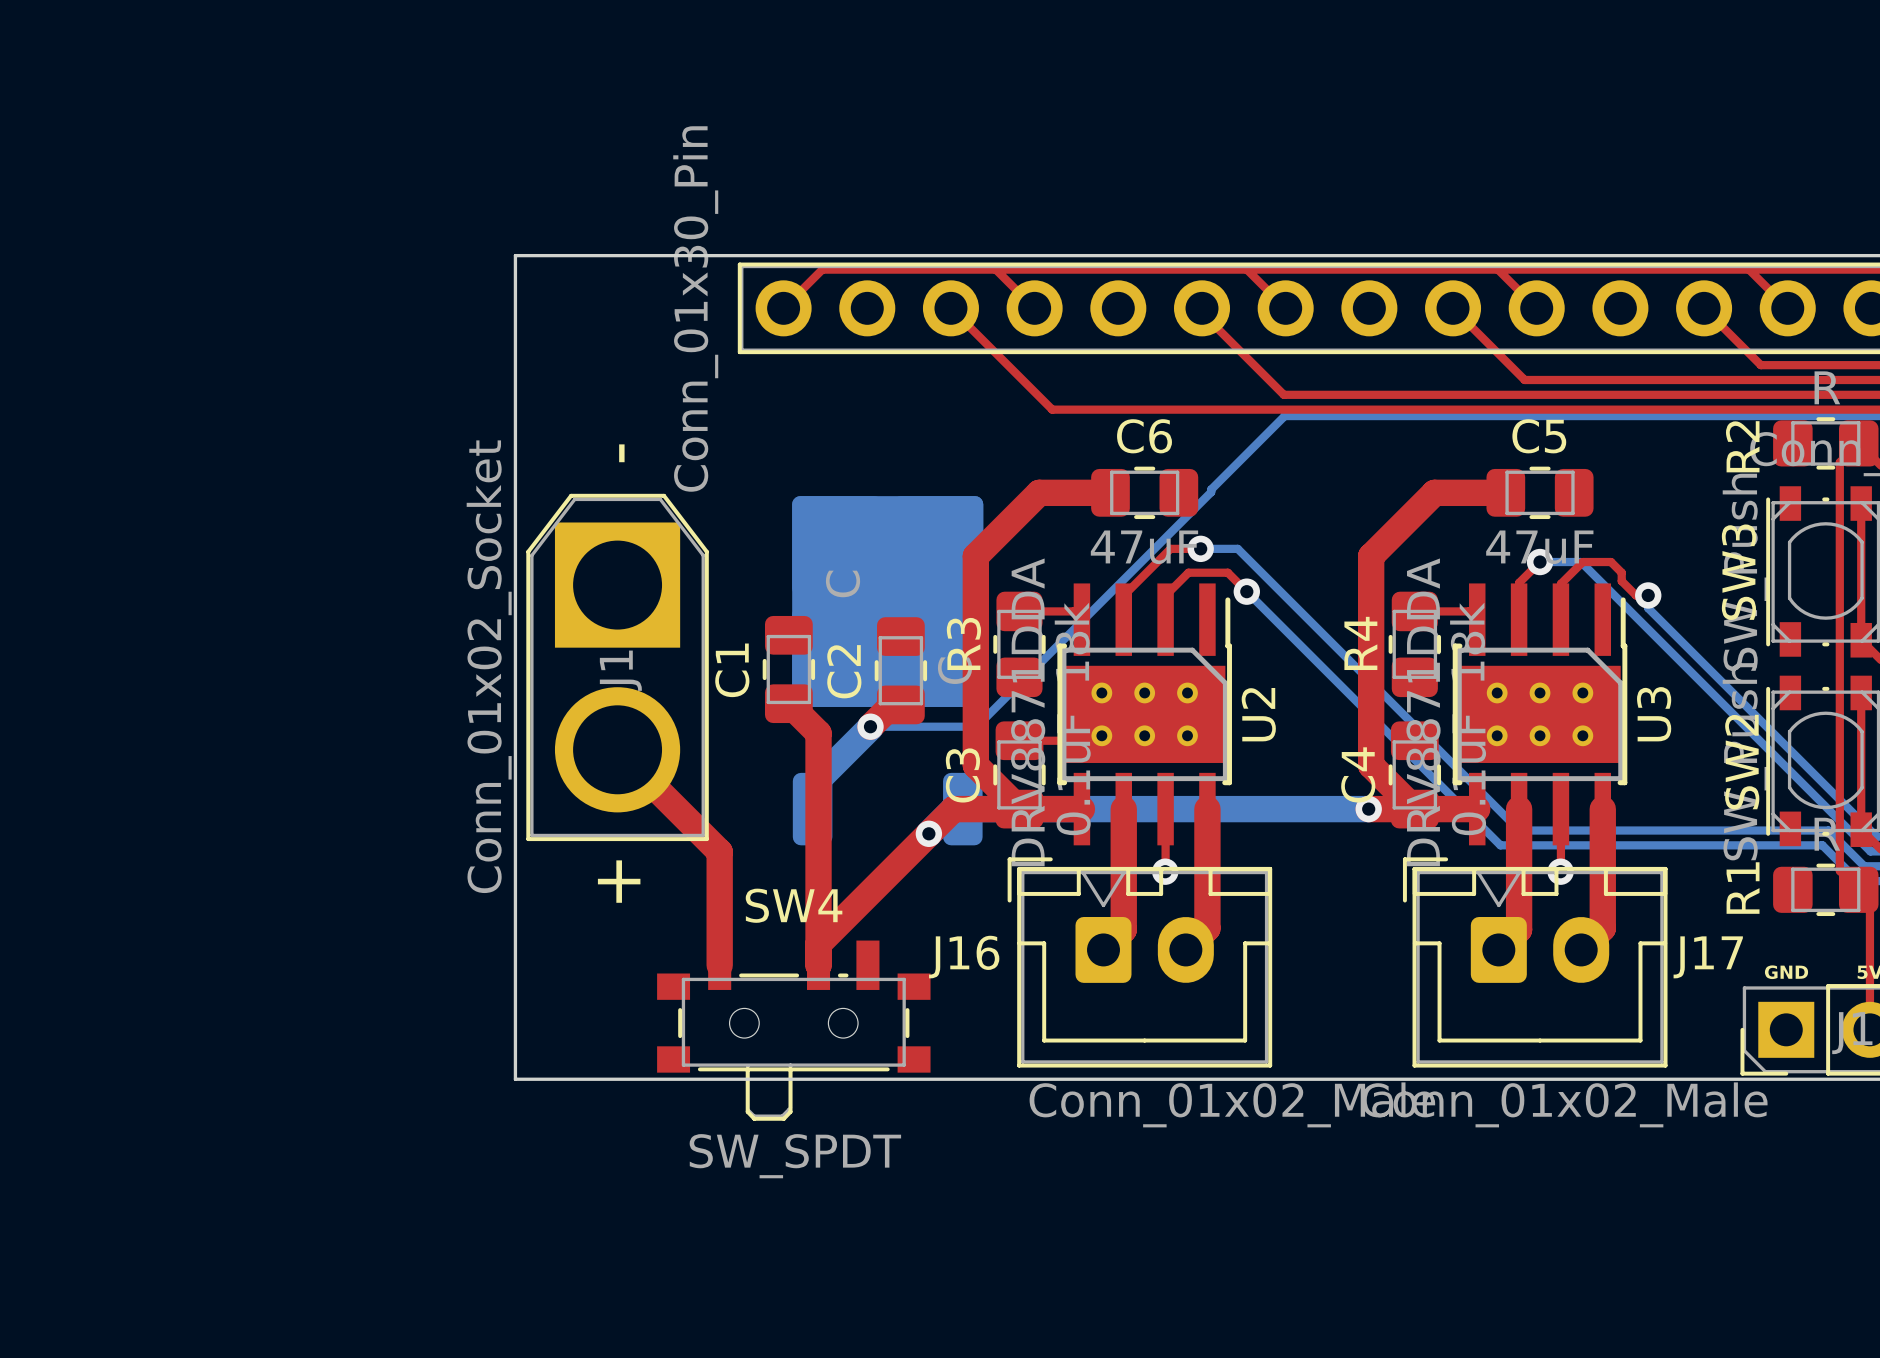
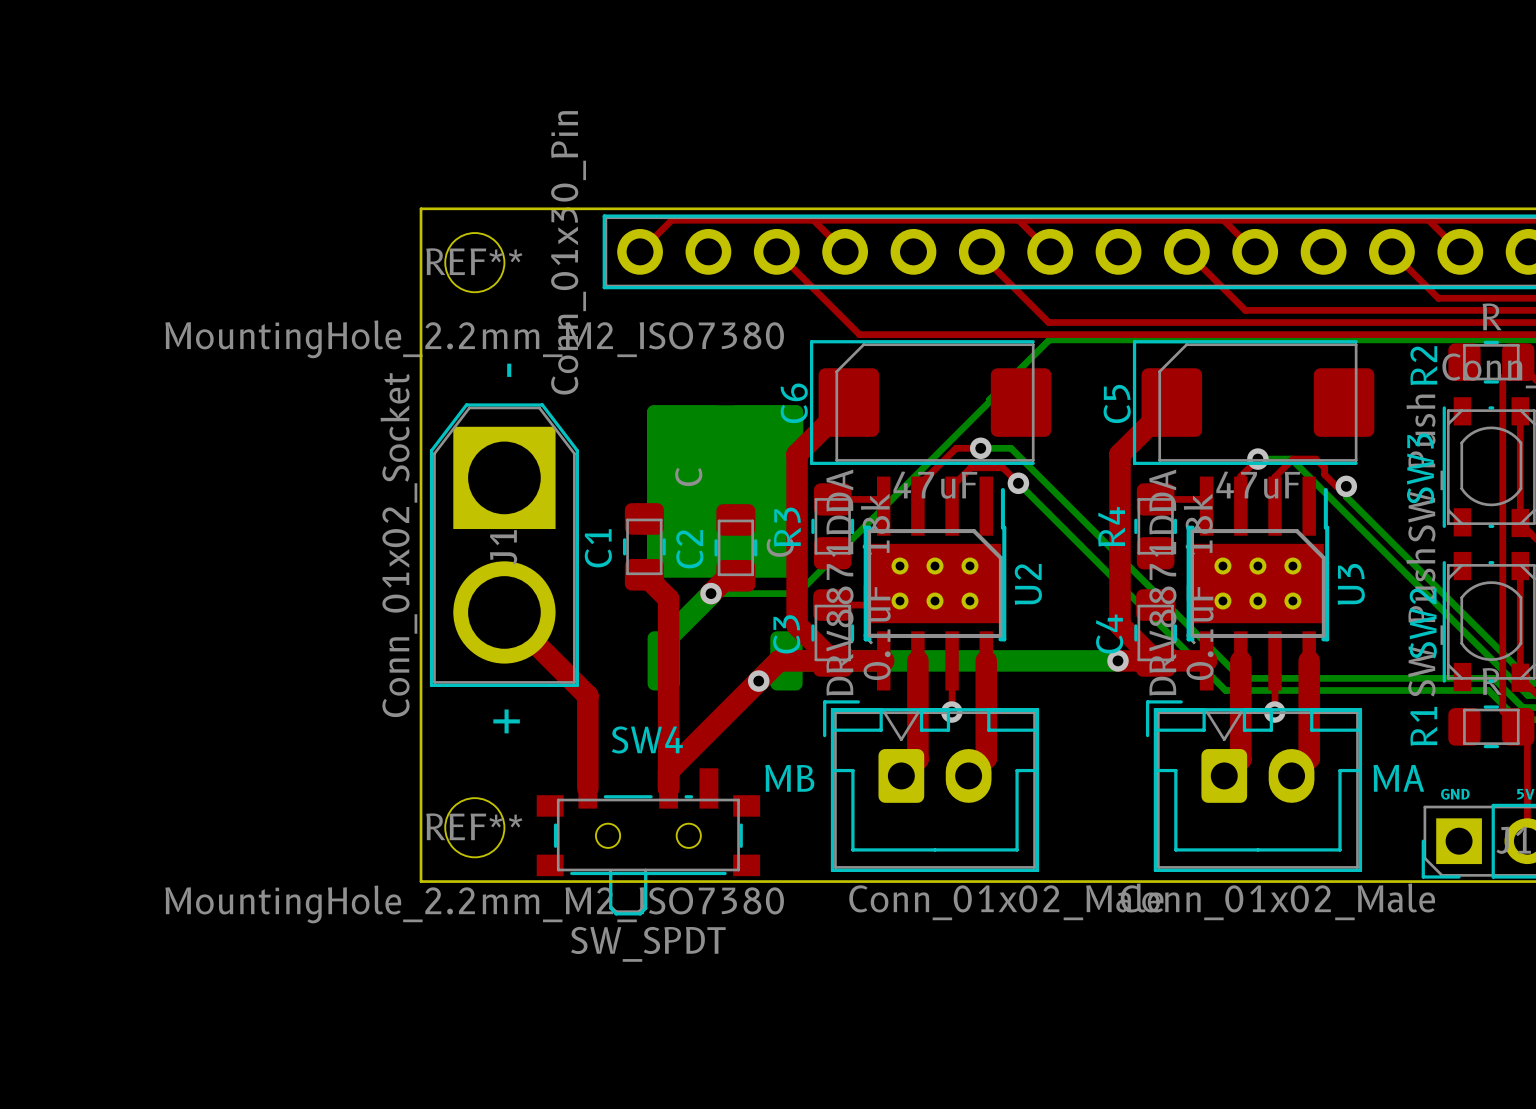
REF**: none -> MountingHole_2.2mm_M2_ISO7380 (474, 262)
C6 name position: C6 (1144, 436) -> C6 (794, 403)
C5 name position: C5 (1539, 436) -> C5 (1117, 403)
C6 footprint: [1091, 466, 1199, 520] -> [810, 340, 1052, 465]
C5 footprint: [1486, 466, 1594, 520] -> [1132, 340, 1375, 465]
top track: (1039, 492) (1110, 492) -> none
top track: (1434, 492) (1505, 492) -> none
J16 name: J16 (964, 957) -> MB (789, 778)
J17 name: J17 (1708, 957) -> MA (1398, 778)
REF**: none -> MountingHole_2.2mm_M2_ISO7380 (474, 827)

